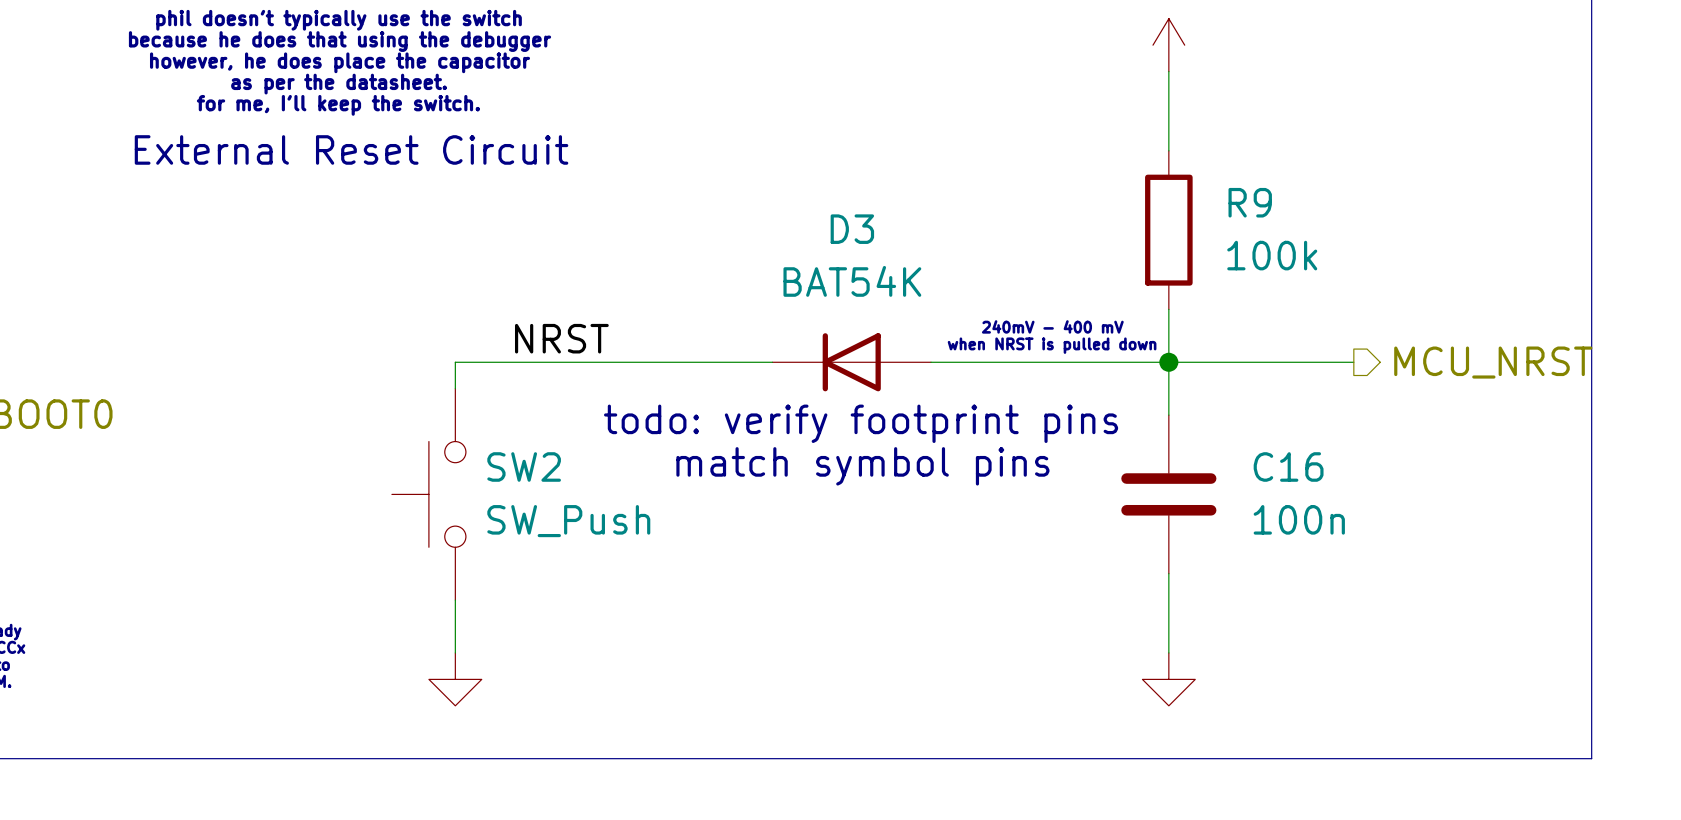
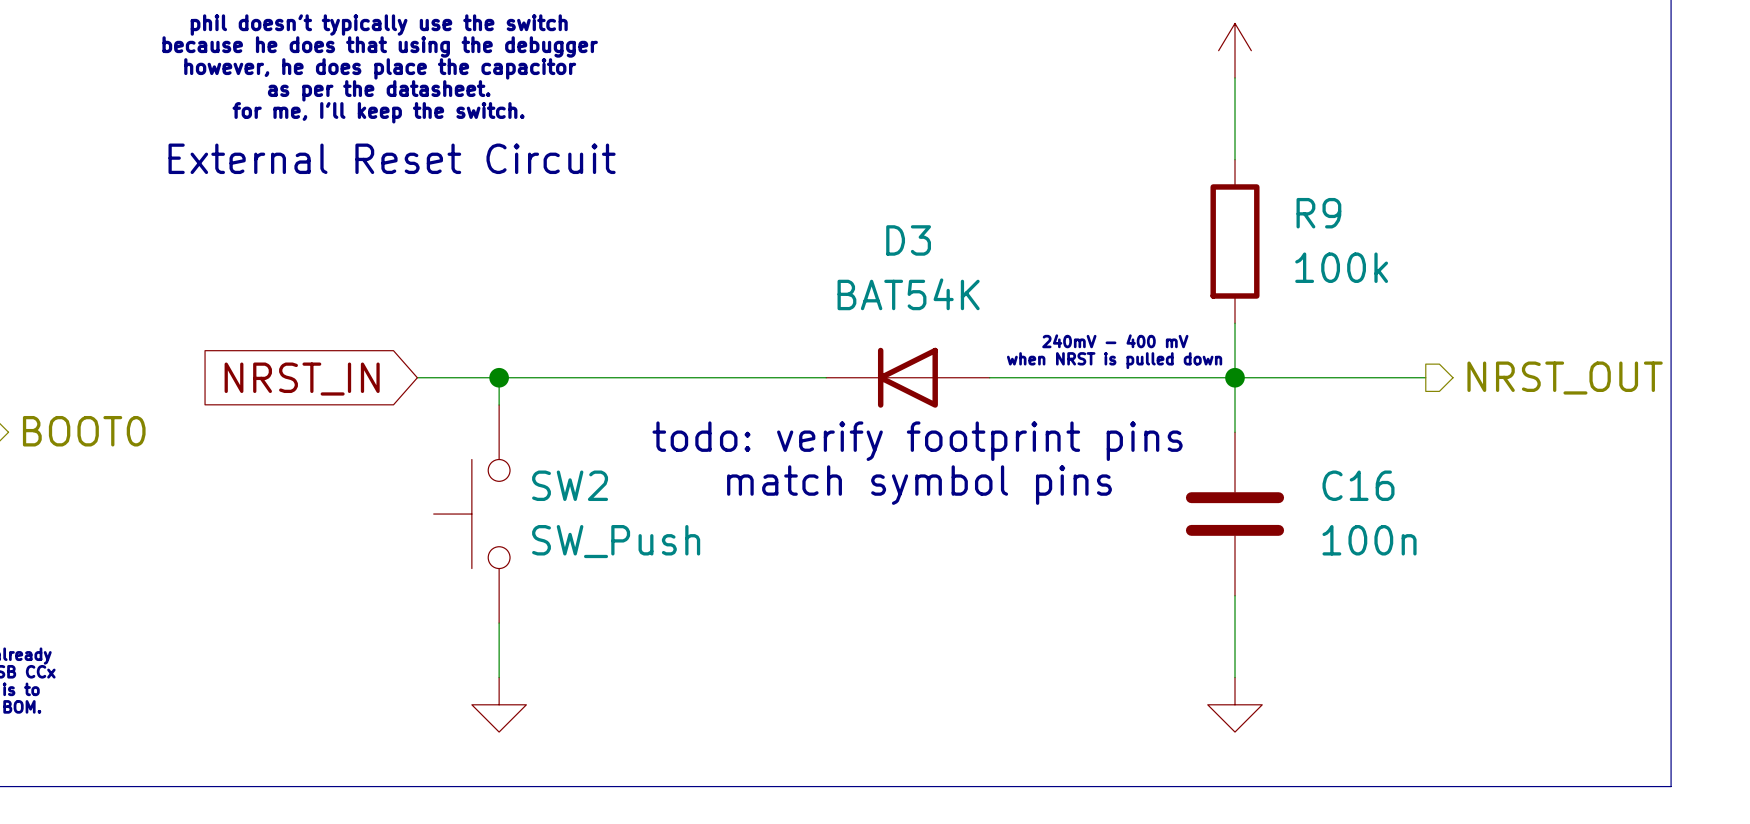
label: NRST (561, 338) -> none
wire: none -> (417, 377) (499, 377)
junction: none -> (499, 377)
hierarchical label: MCU_NRST (1493, 362) -> NRST_OUT (1565, 378)
global label: none -> NRST_IN (302, 379)

